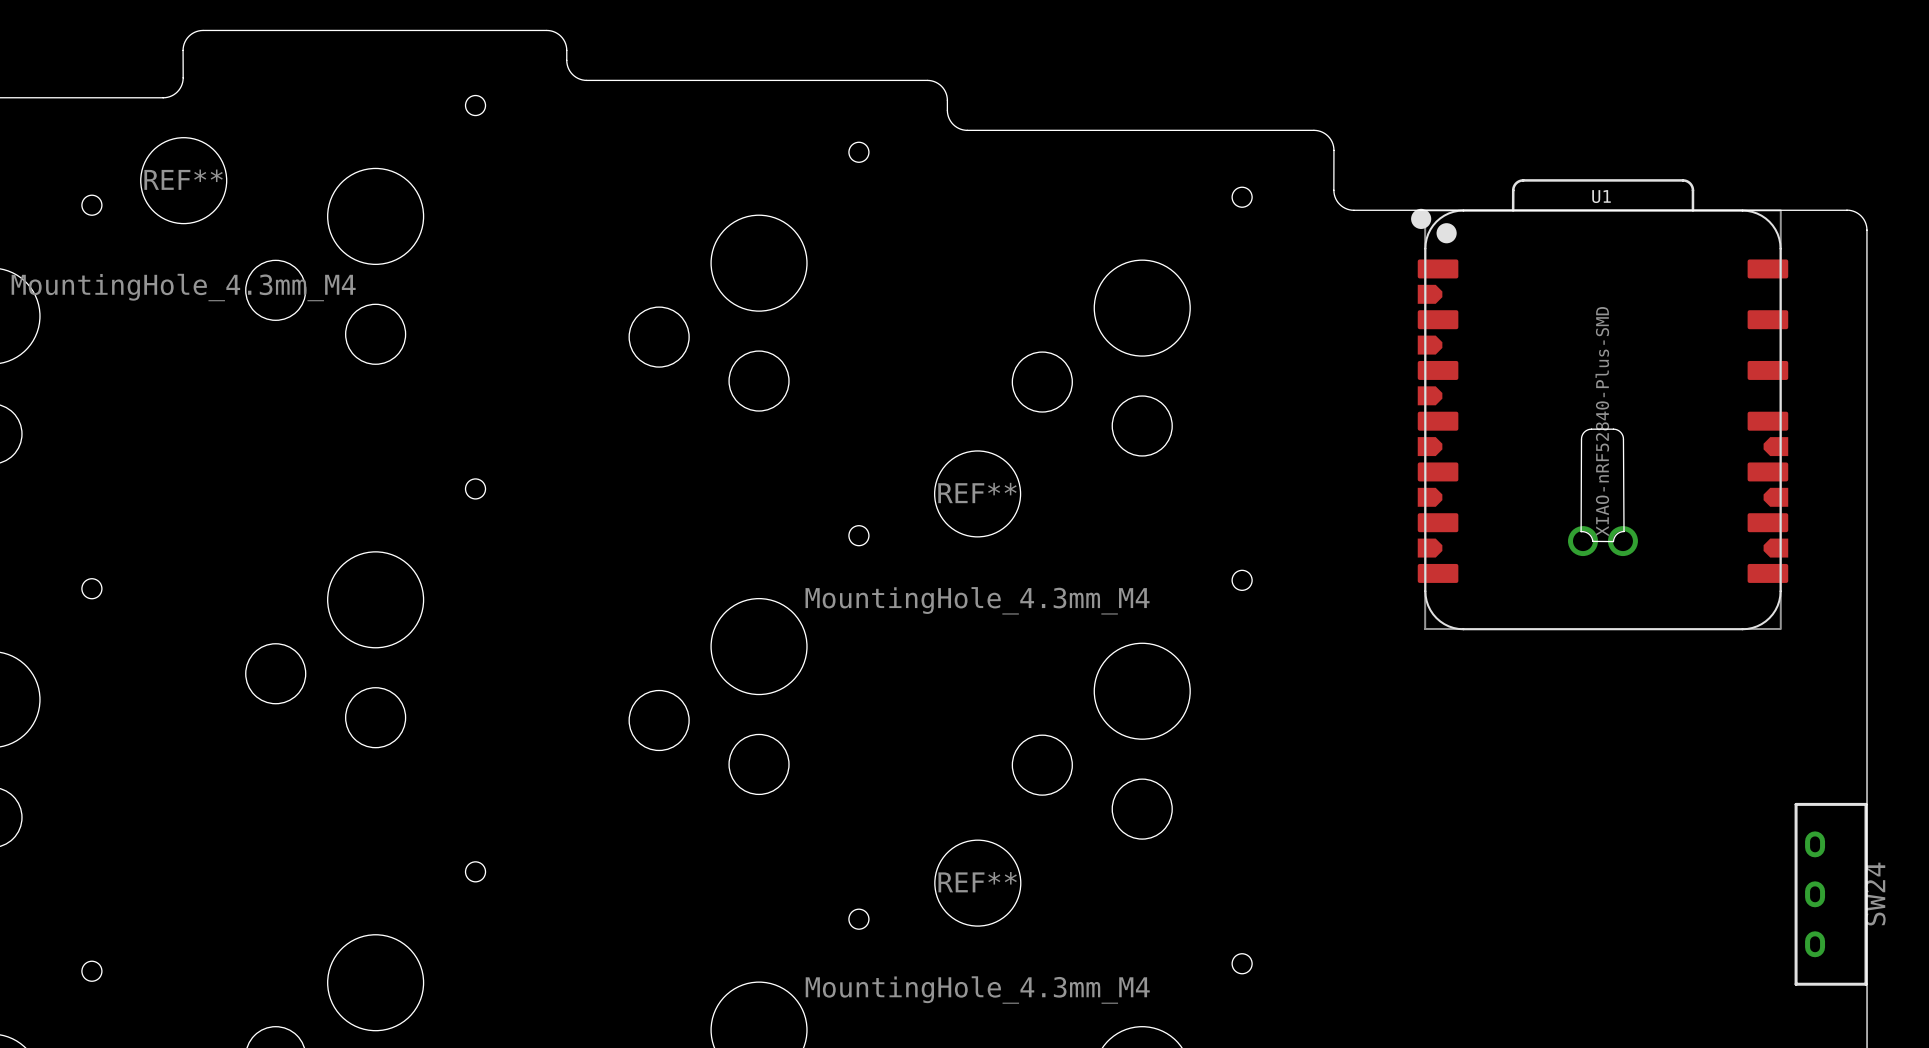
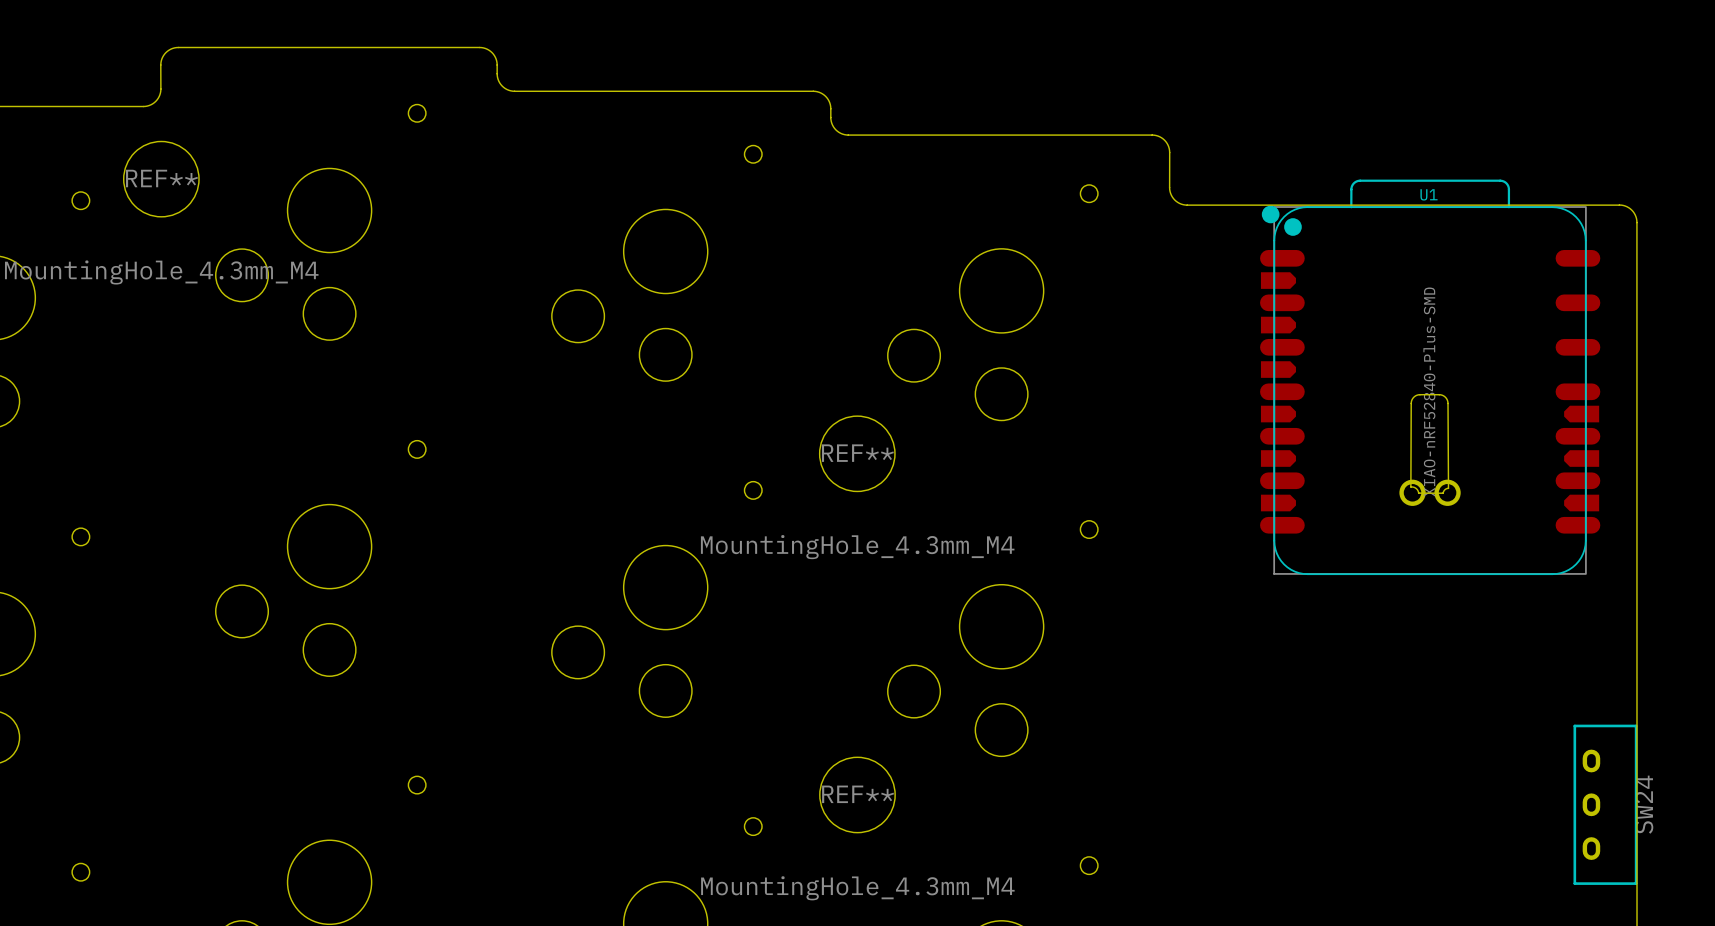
U1 footprint: [1411, 179, 1789, 631] -> [1260, 179, 1601, 576]

